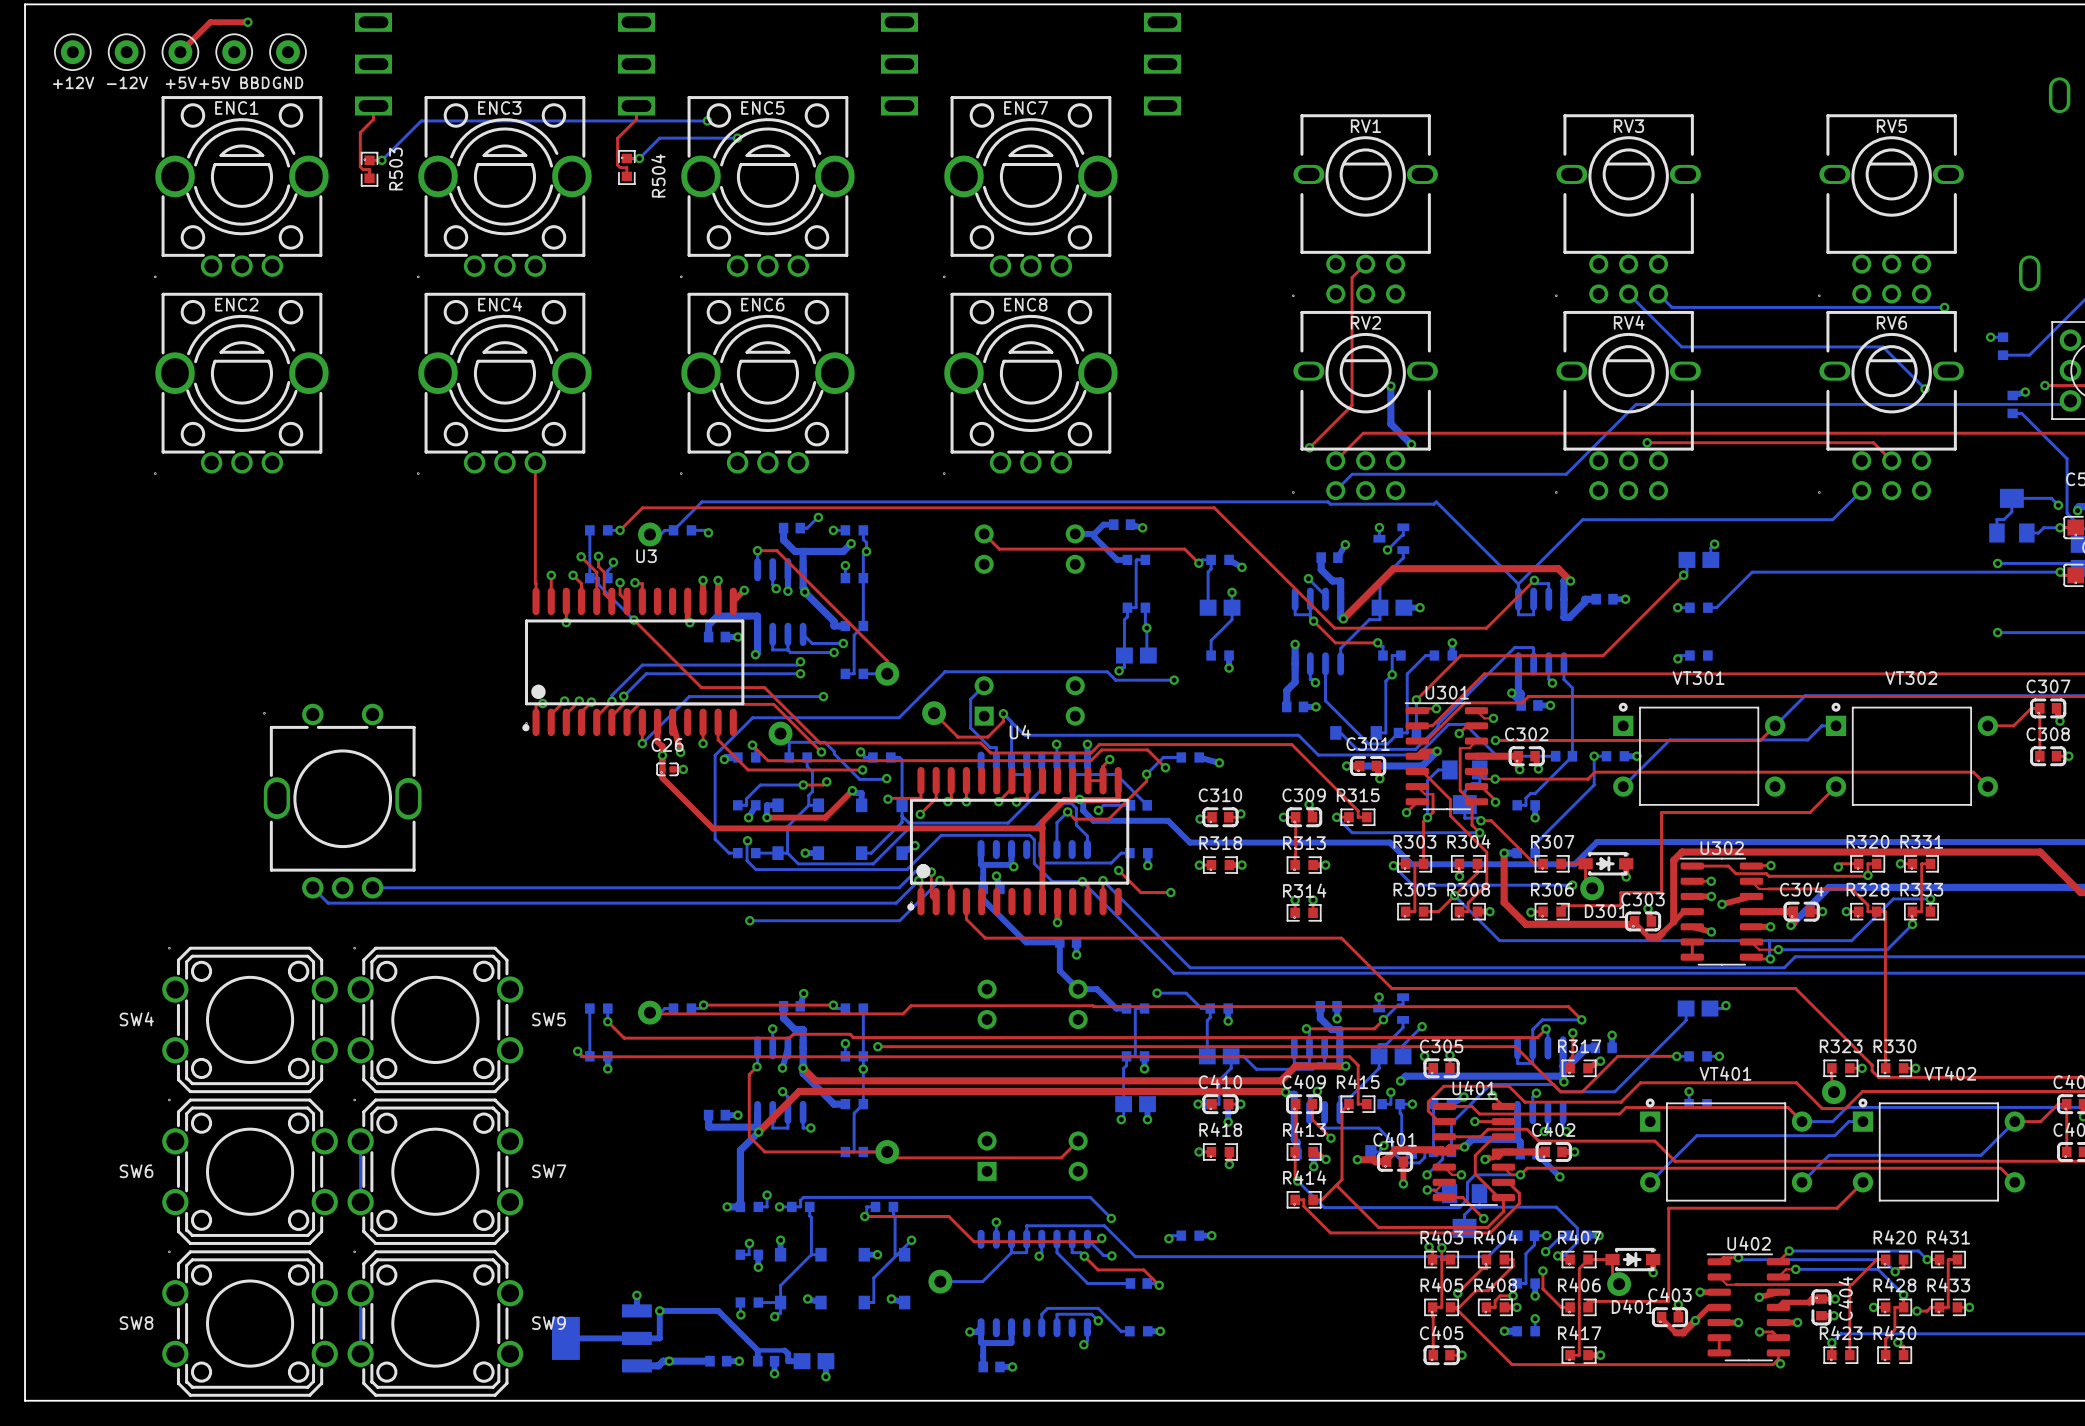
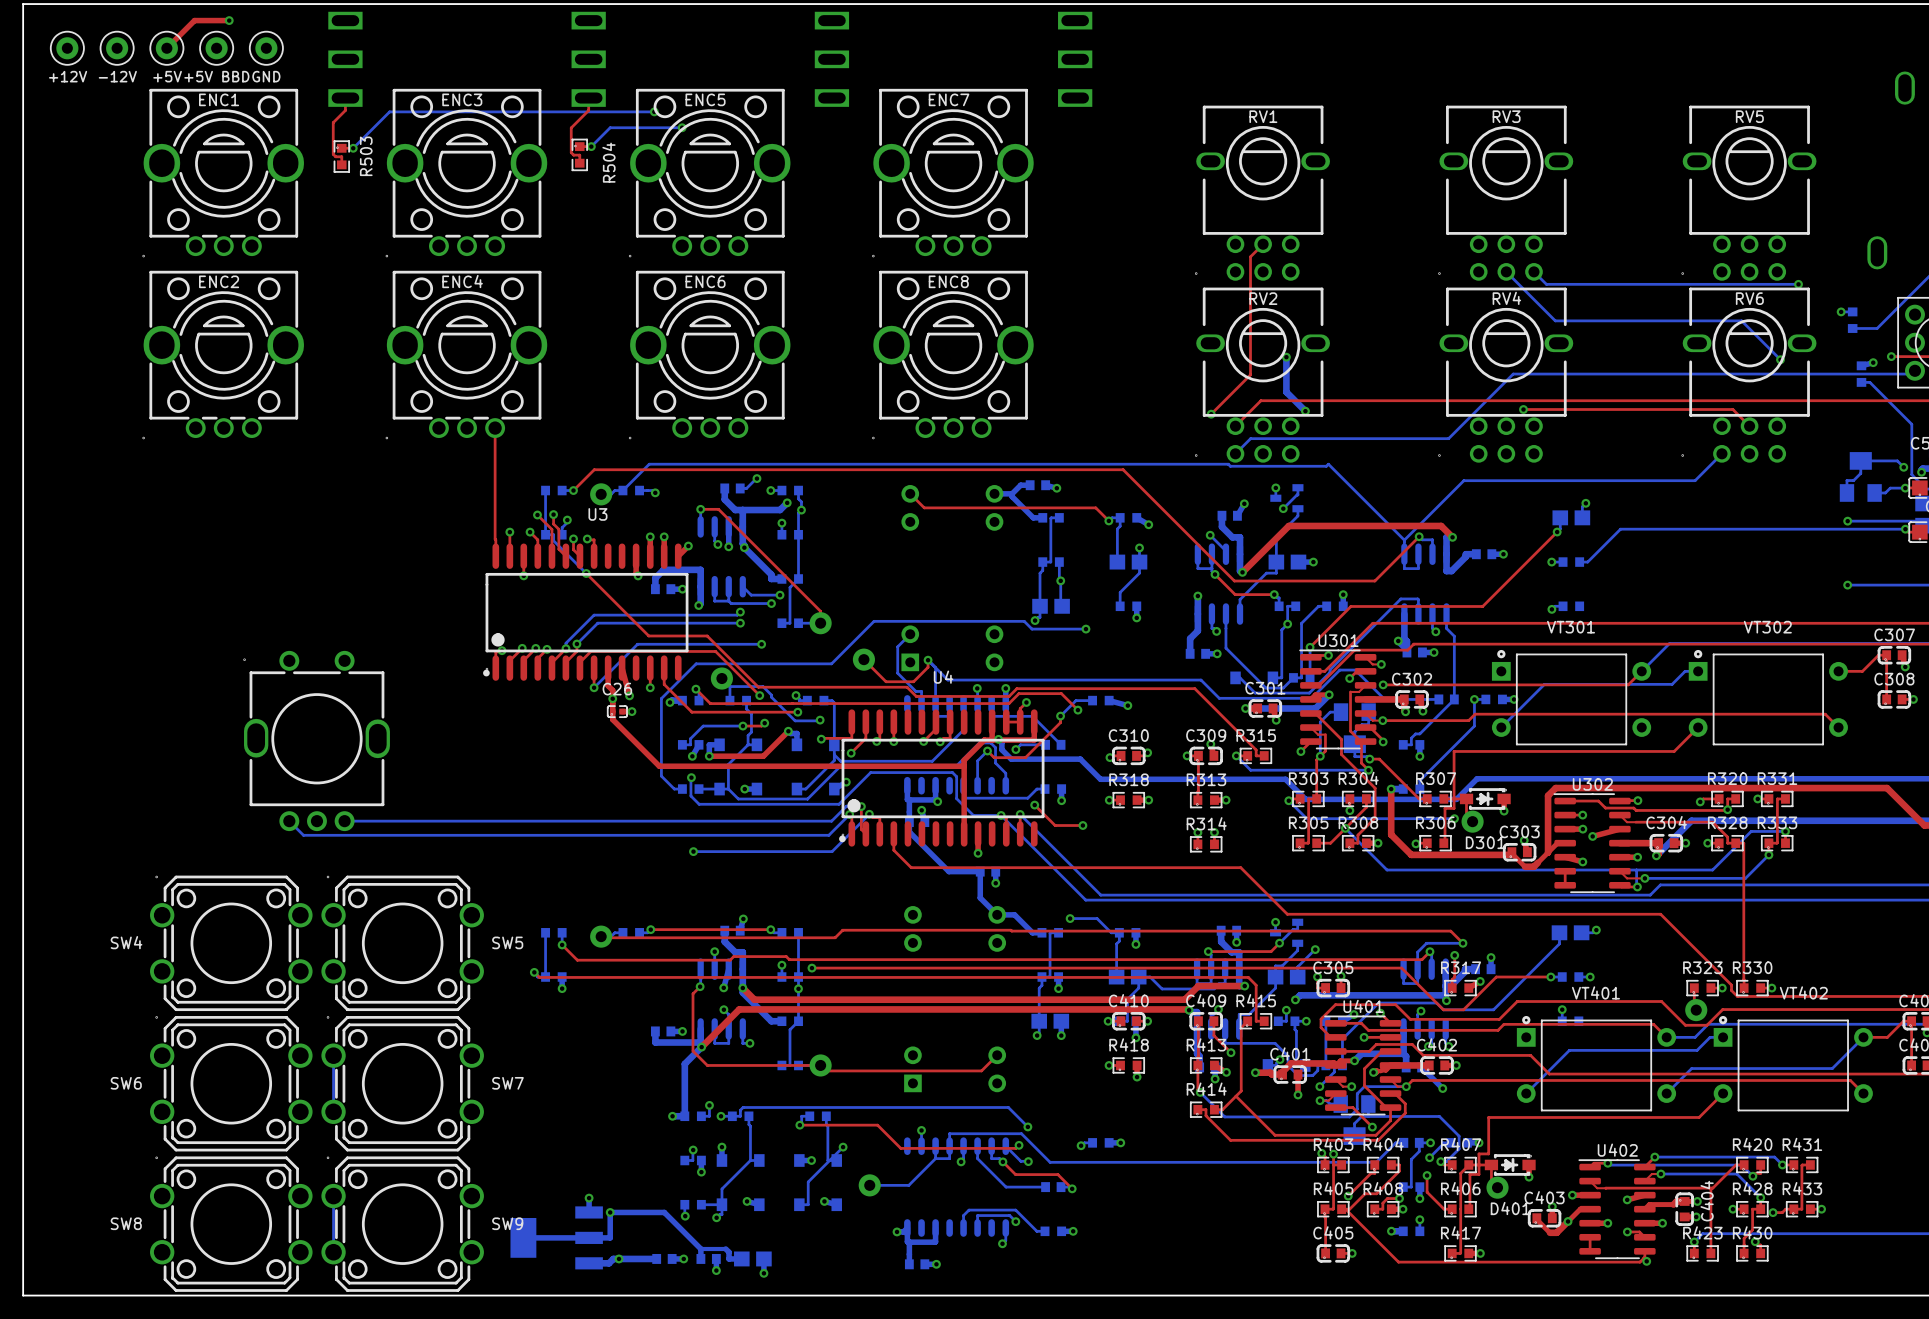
top track: (1661, 812) (1661, 892) (1620, 892) (1620, 905) (1562, 905) -> (1536, 751) (1454, 751) (1454, 808) (1445, 808) (1445, 837)
top track: (1668, 1208) (1668, 1301) (1588, 1301) (1588, 1307) -> (1543, 1117) (1488, 1117) (1488, 1153) (1479, 1153) (1479, 1174) (1469, 1174) (1468, 1209)

